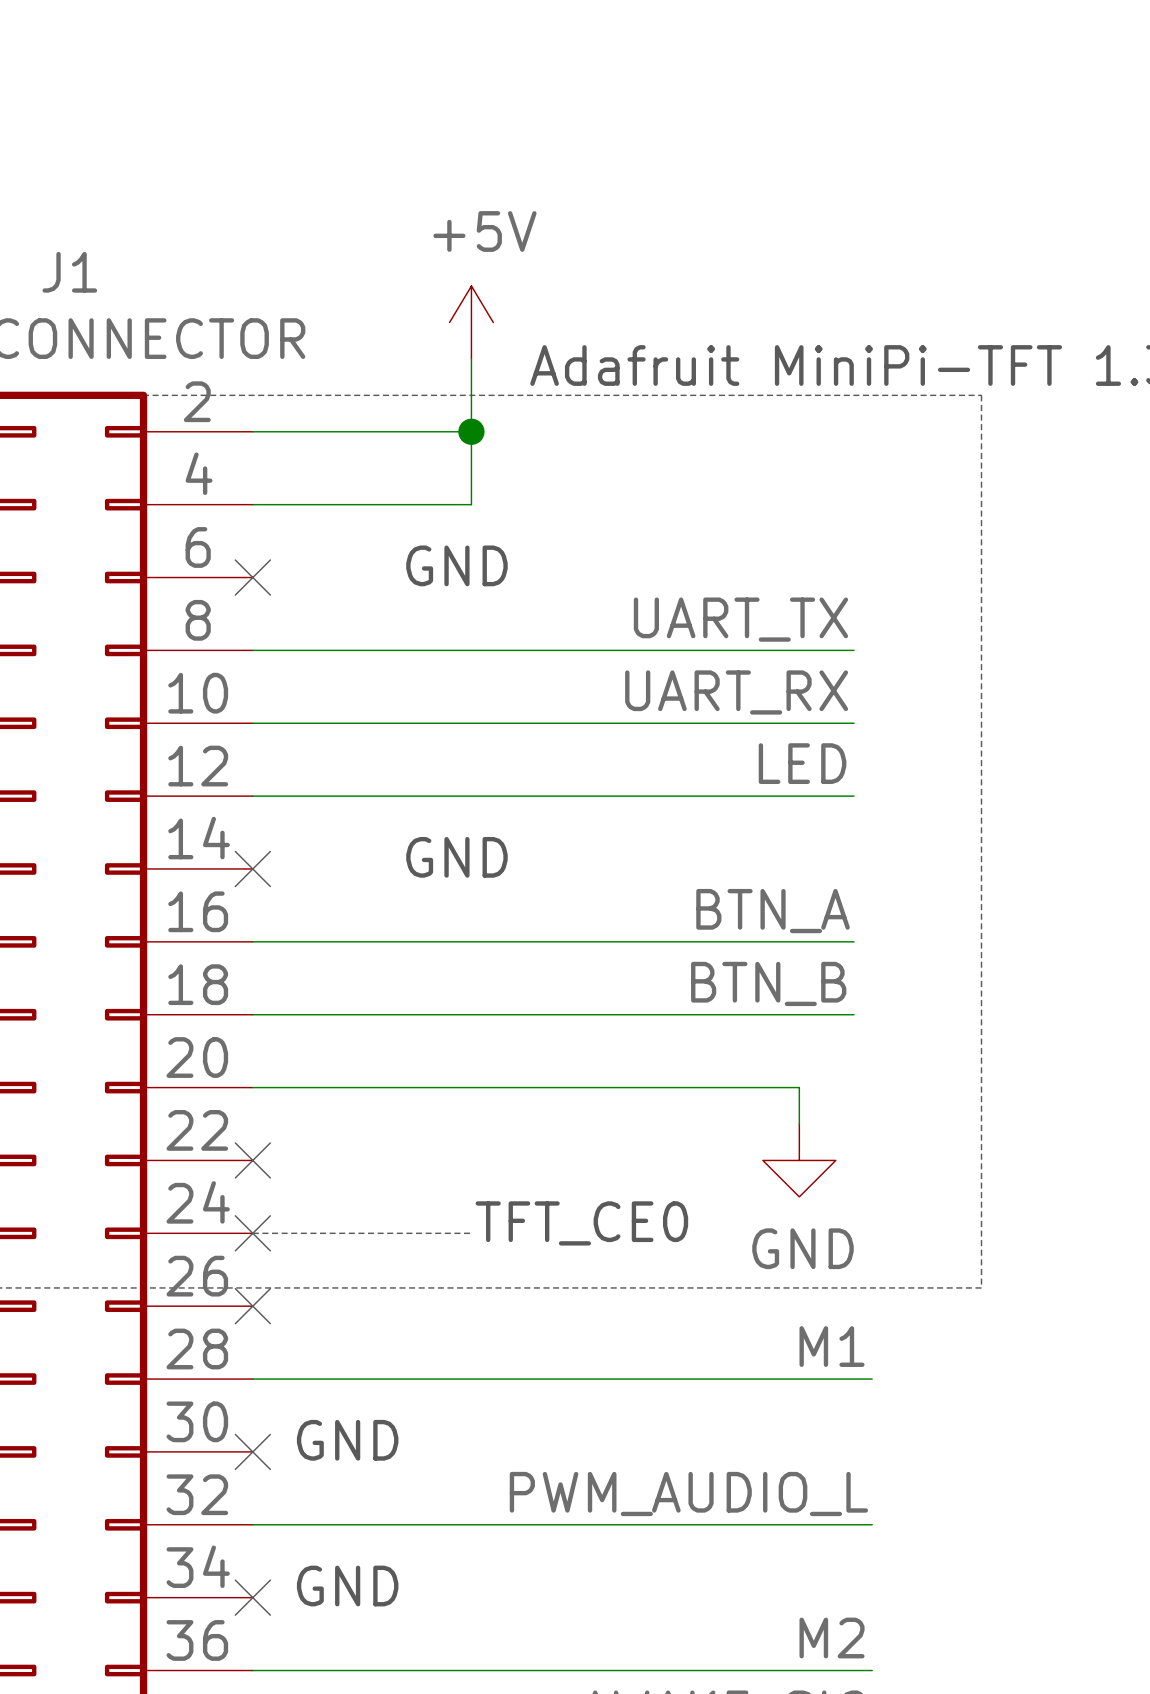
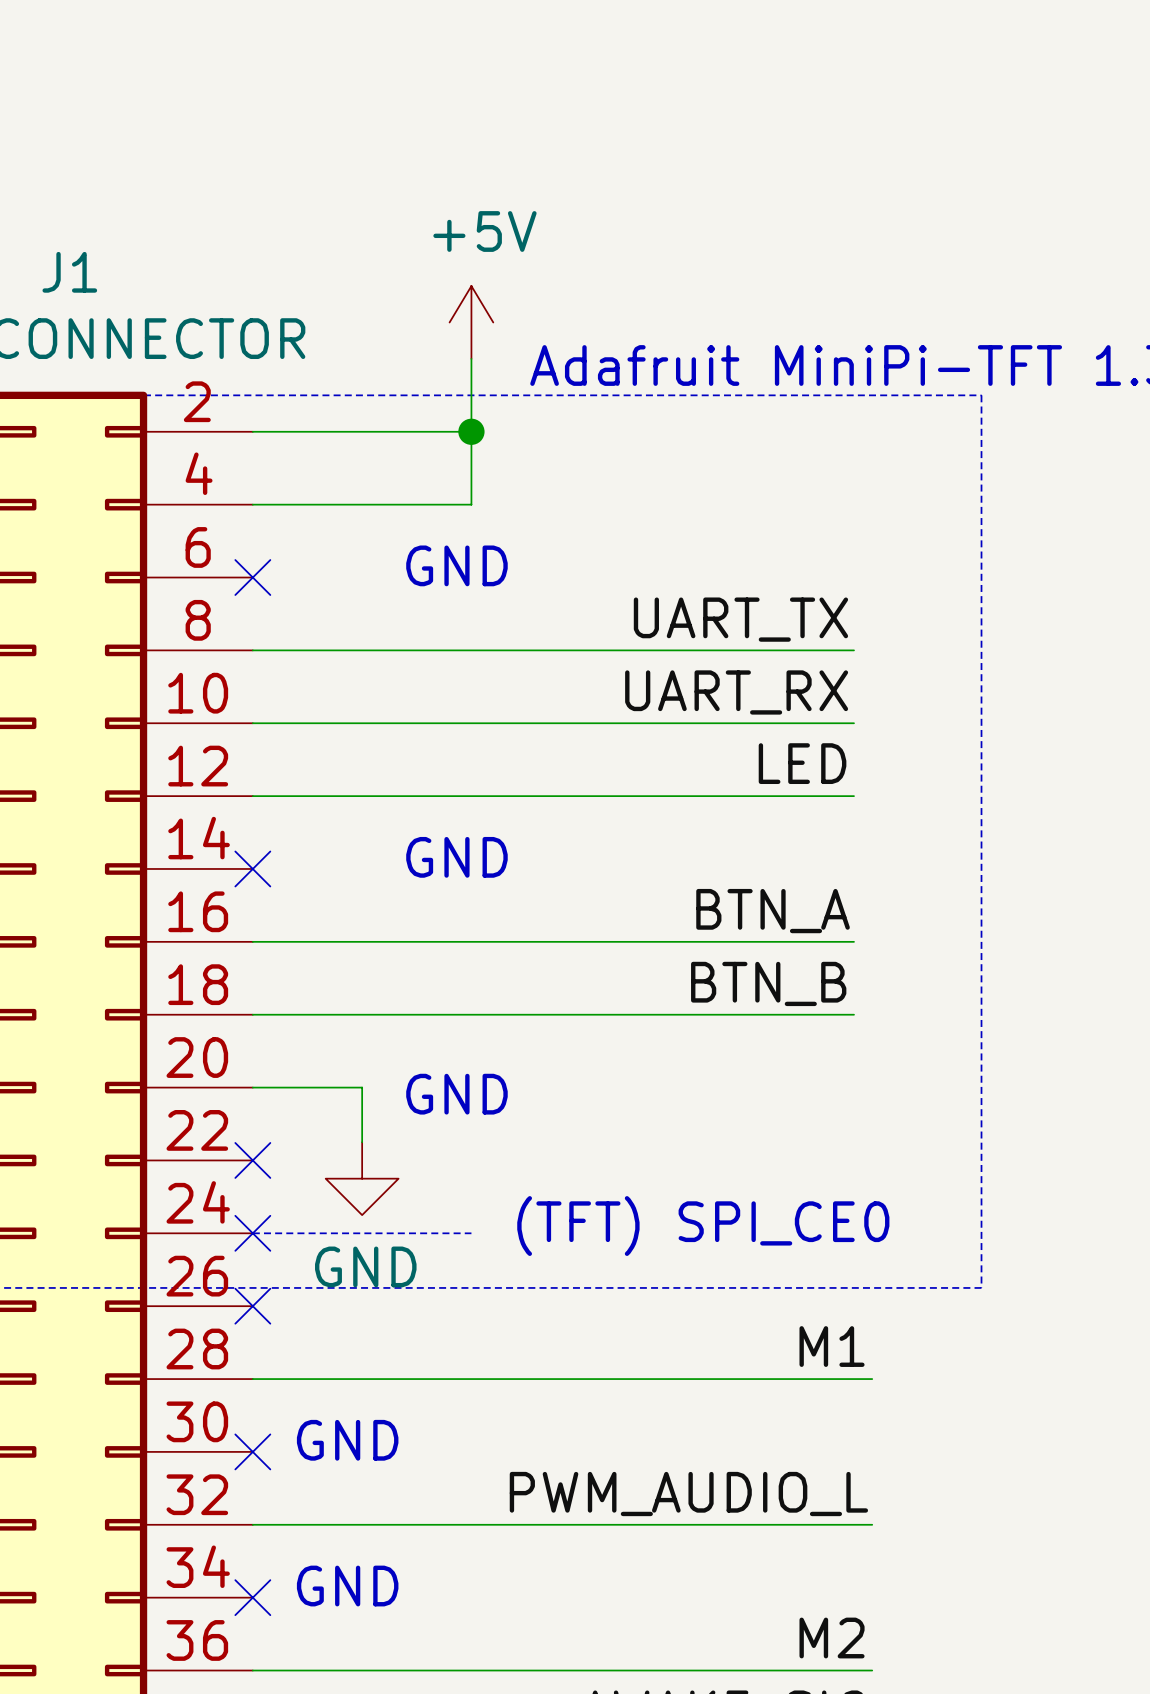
wire: (362, 1087) (799, 1087) (799, 1124) -> (362, 1087) (362, 1142)
text: none -> GND (456, 1094)
power symbol position: GND (799, 1160) -> GND (362, 1178)
text: TFT_CE0 (581, 1223) -> (TFT) SPI_CE0 (703, 1226)

